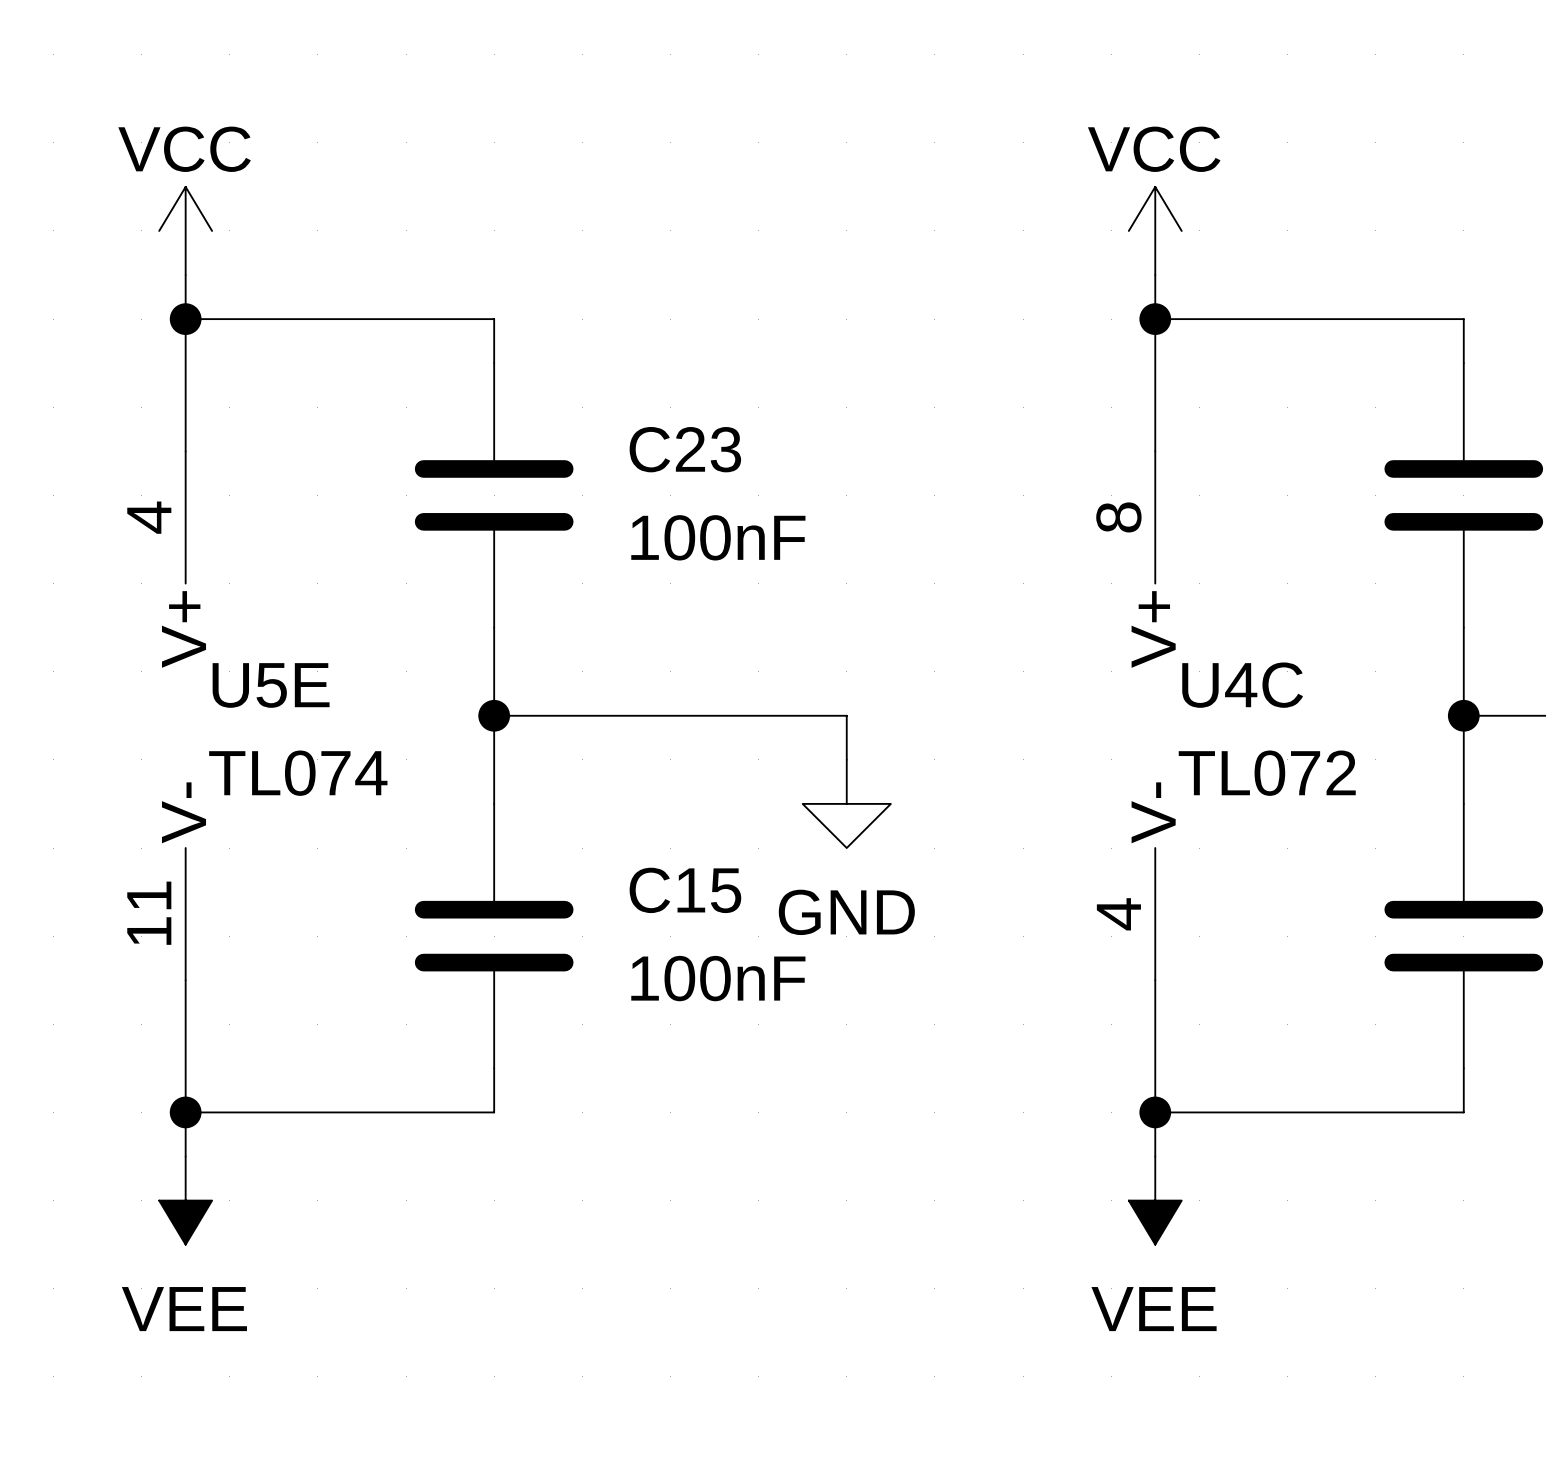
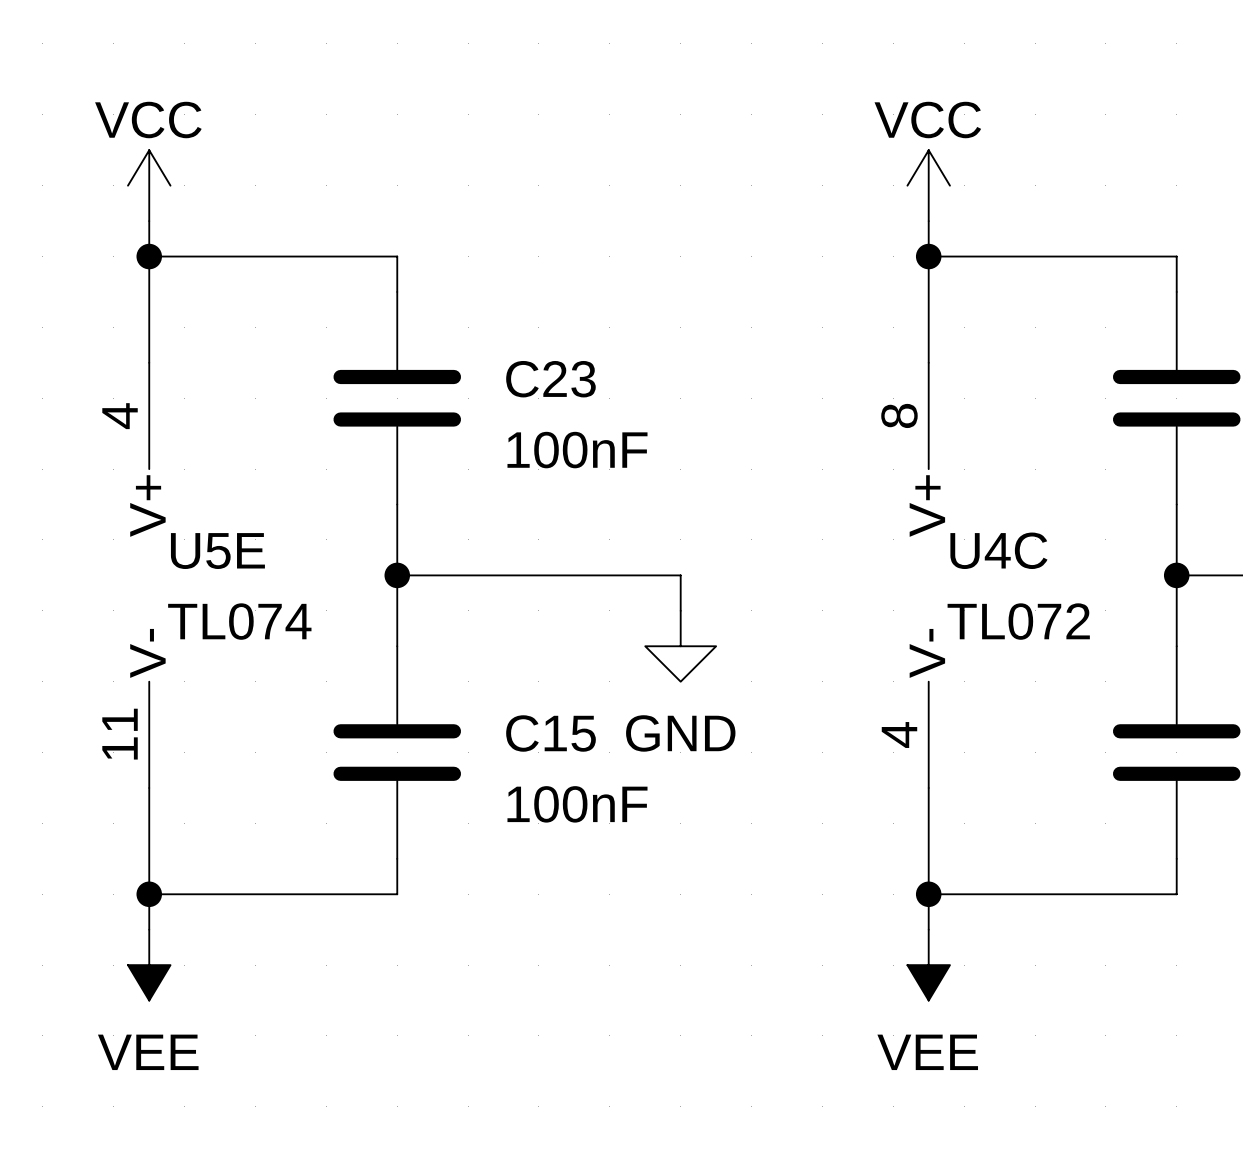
C23 name position: C23 (685, 449) -> C23 (550, 379)
C23 value position: 100nF (718, 537) -> 100nF (577, 450)
C15 name position: C15 (685, 890) -> C15 (551, 733)
C15 value position: 100nF (718, 978) -> 100nF (577, 804)

